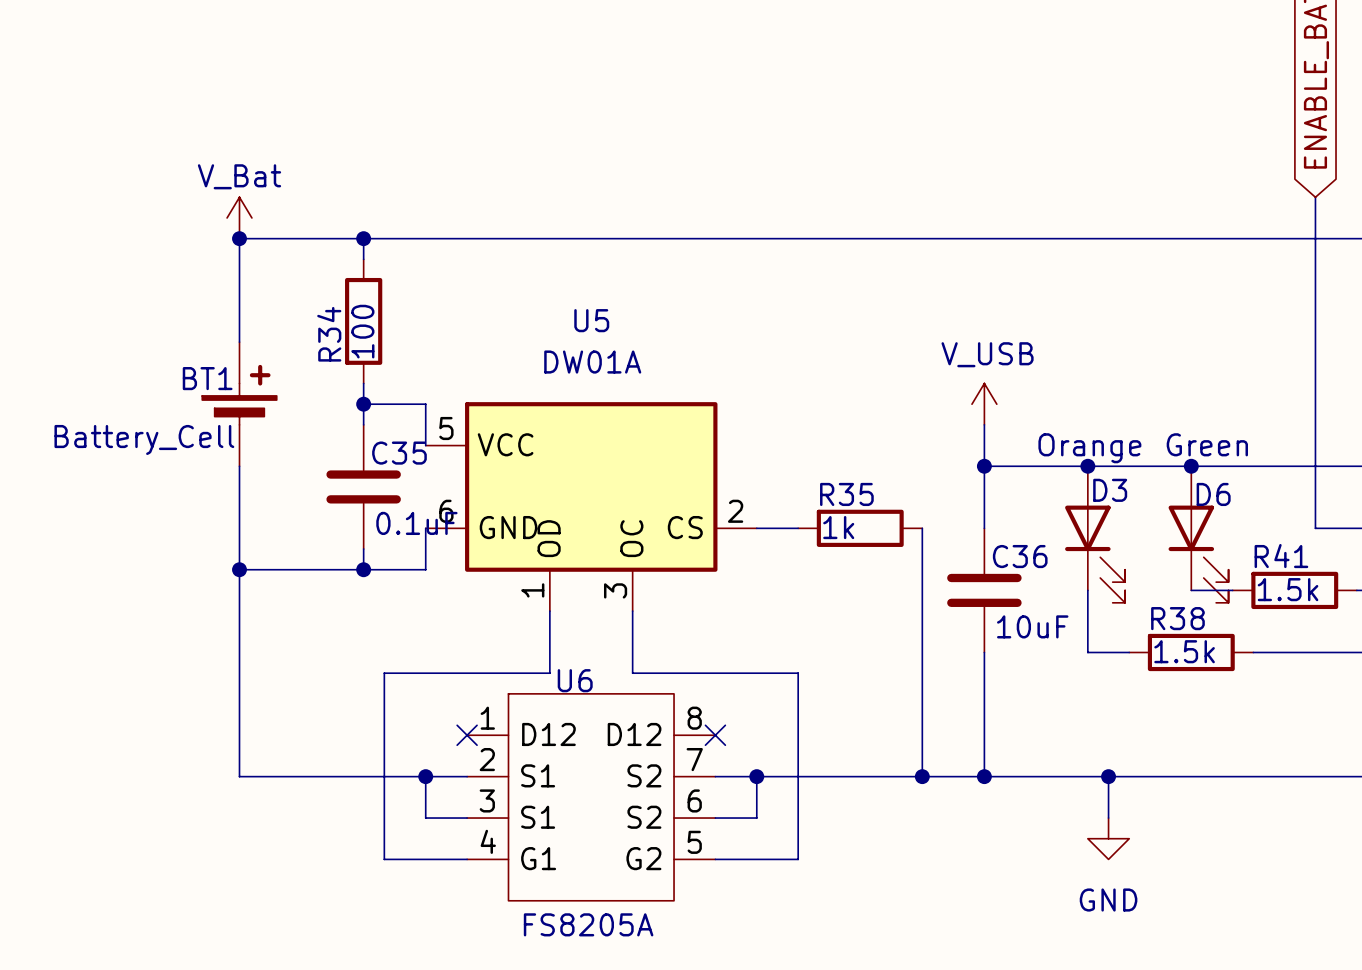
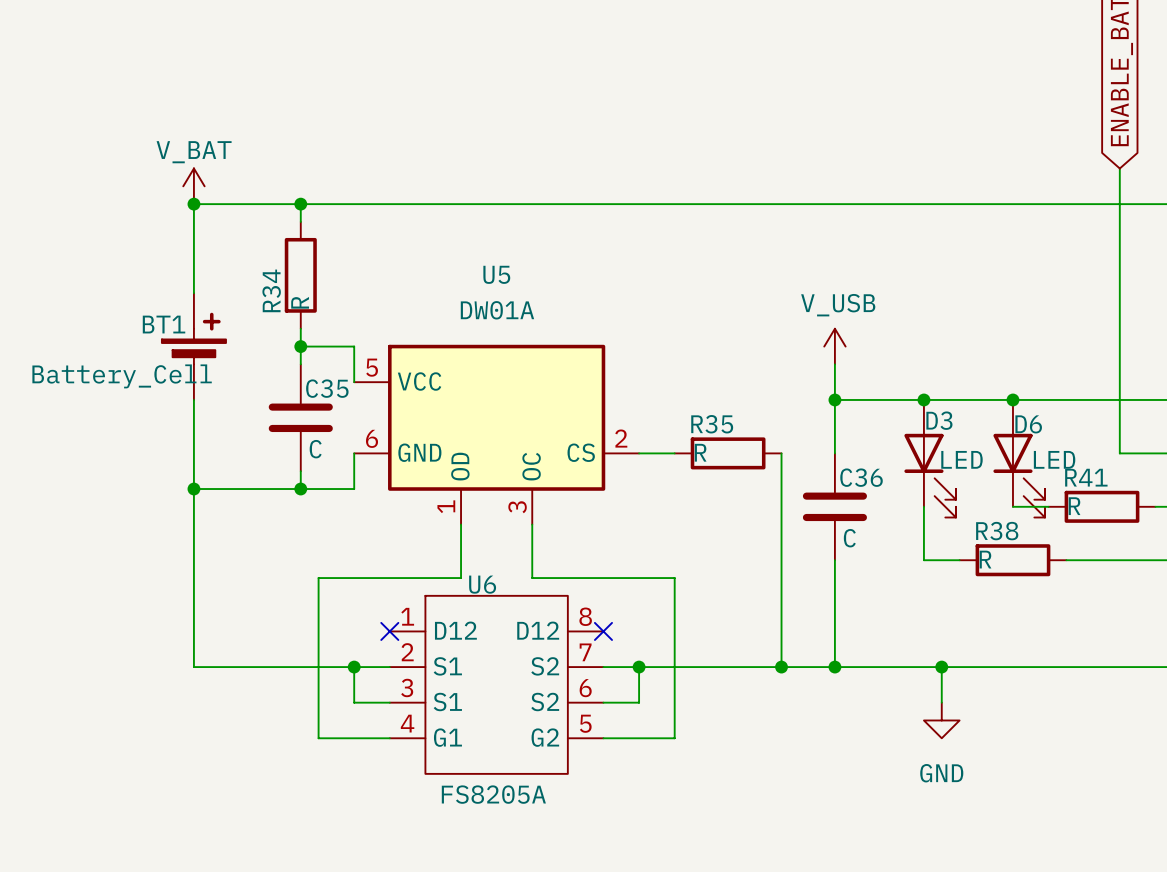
power symbol: V_Bat (239, 217) -> V_BAT (193, 186)
R34 value: 100 (362, 331) -> R (300, 302)
D6 value: Green (1207, 444) -> LED (1054, 459)
D3 value: Orange (1089, 448) -> LED (961, 459)
C35 value: 0.1uF (416, 523) -> C (315, 449)
R35 value: 1k (838, 527) -> R (700, 452)
R41 value: 1.5k (1288, 589) -> R (1074, 506)
C36 value: 10uF (1032, 626) -> C (849, 538)
R38 value: 1.5k (1184, 651) -> R (985, 559)

